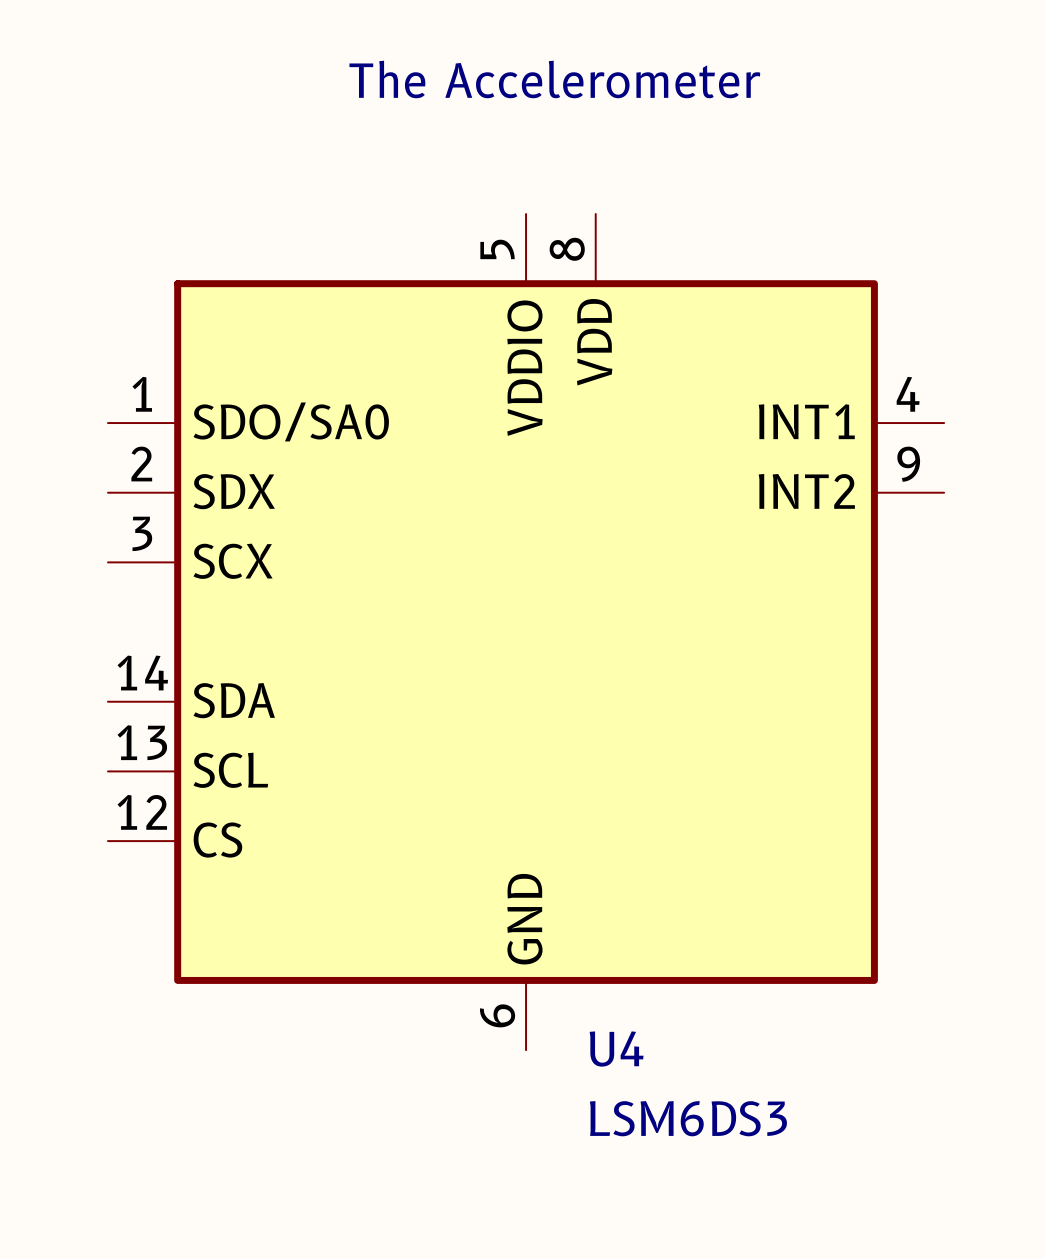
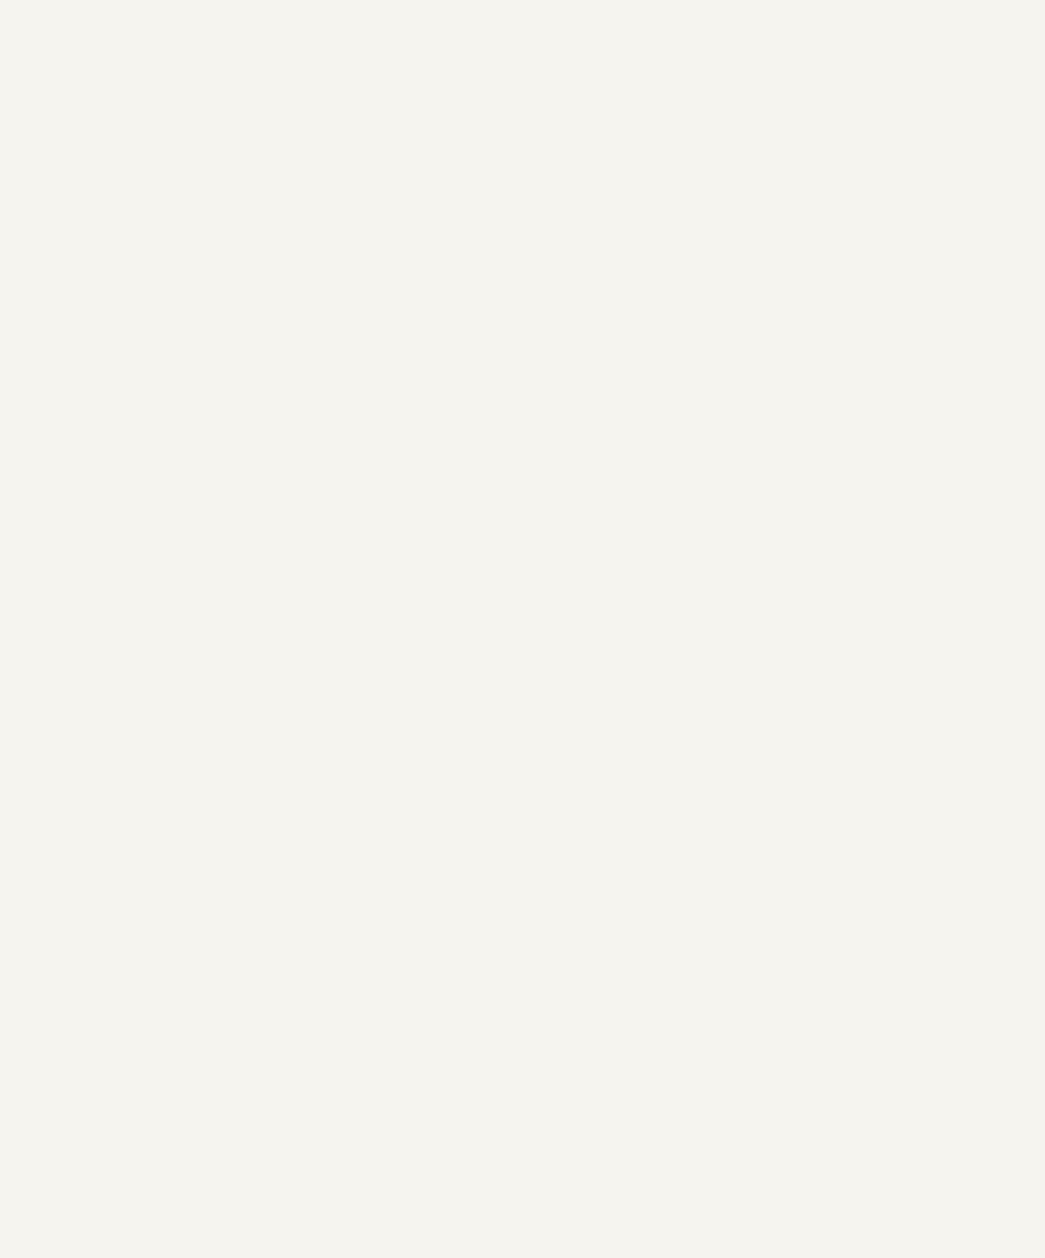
text: The Accelerometer (554, 79) -> none
U4: LSM6DS3 (526, 632) -> none

